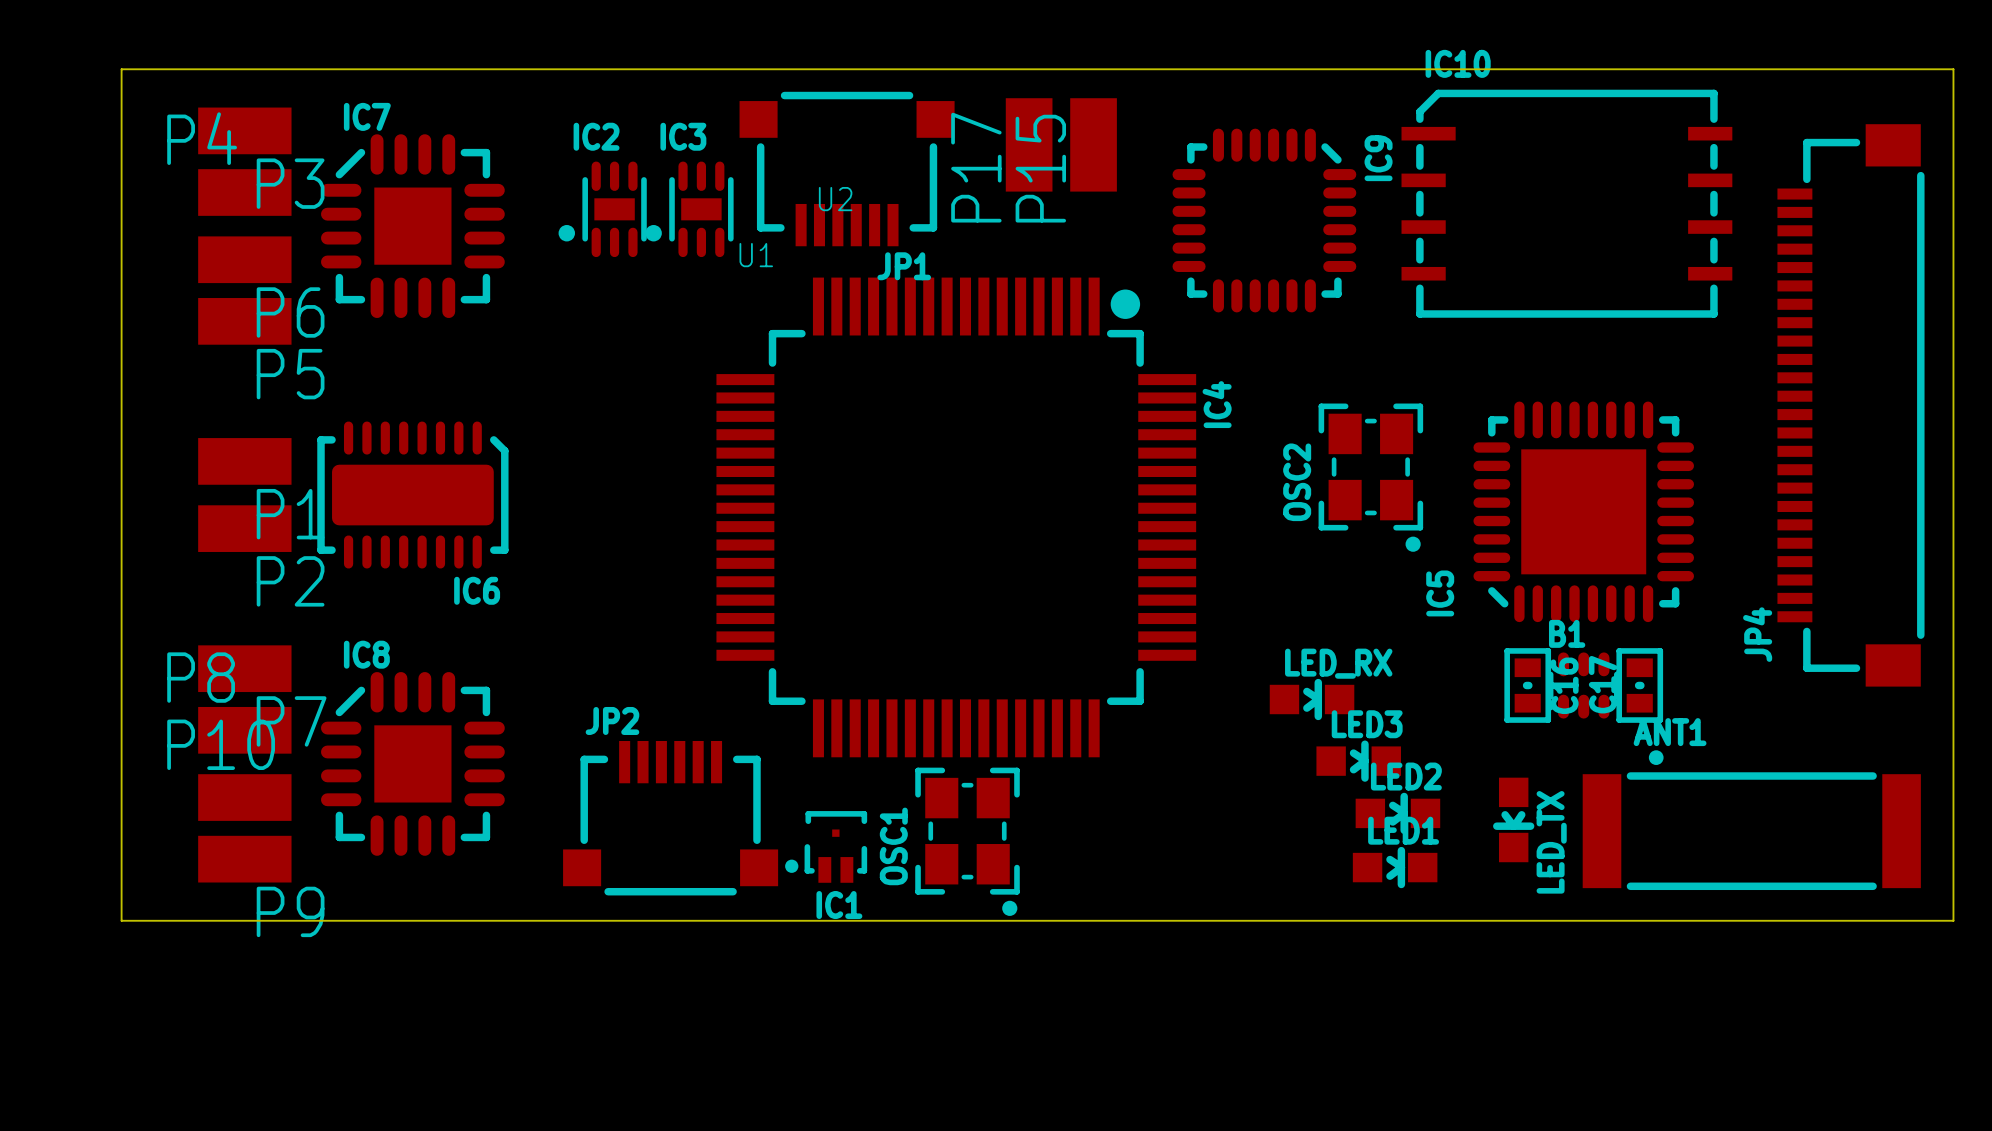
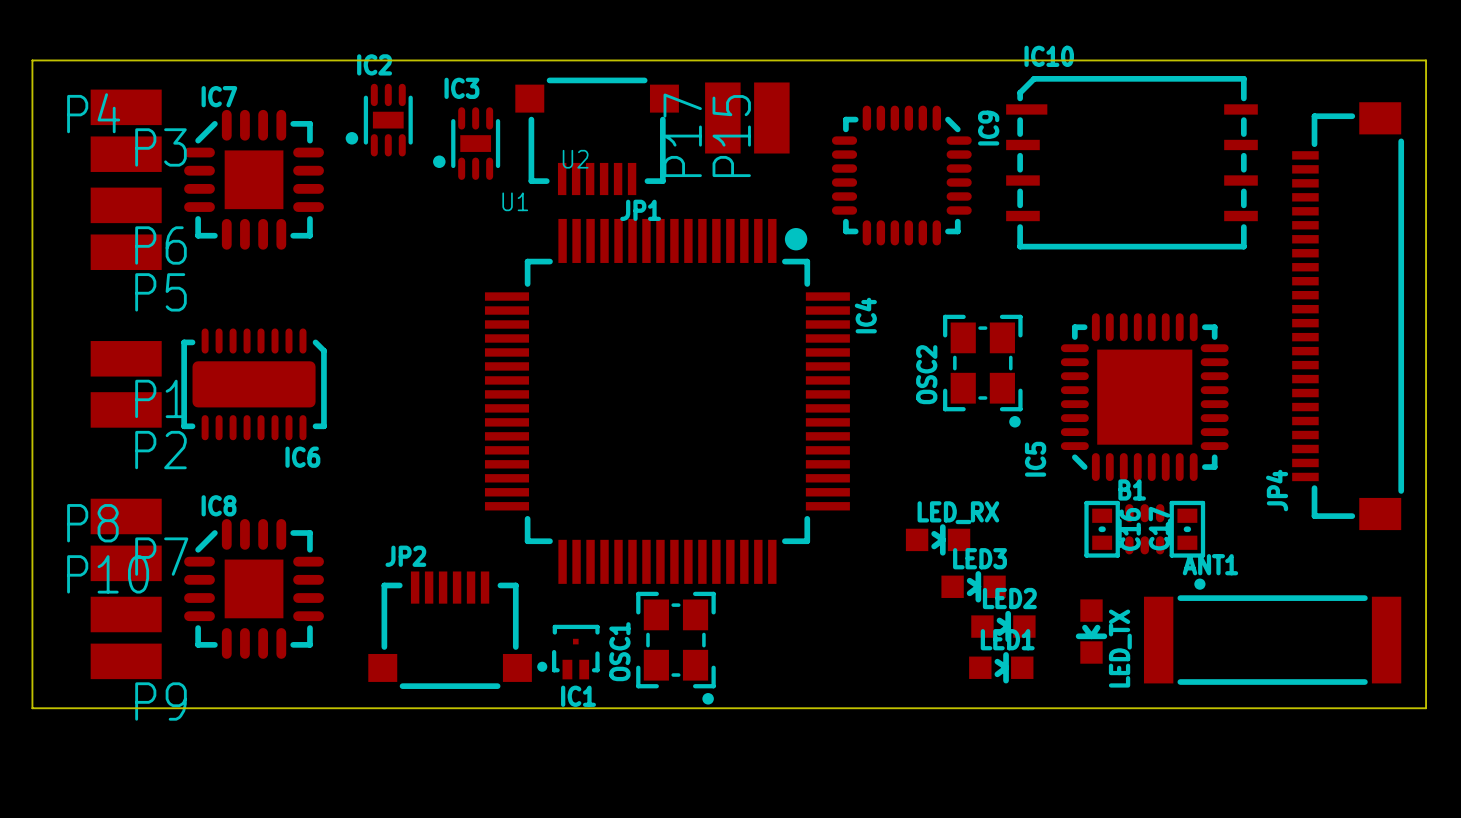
JP1 position: (847, 169) -> (597, 136)
IC2 position: (602, 209) -> (379, 120)
IC3 position: (689, 209) -> (466, 143)

